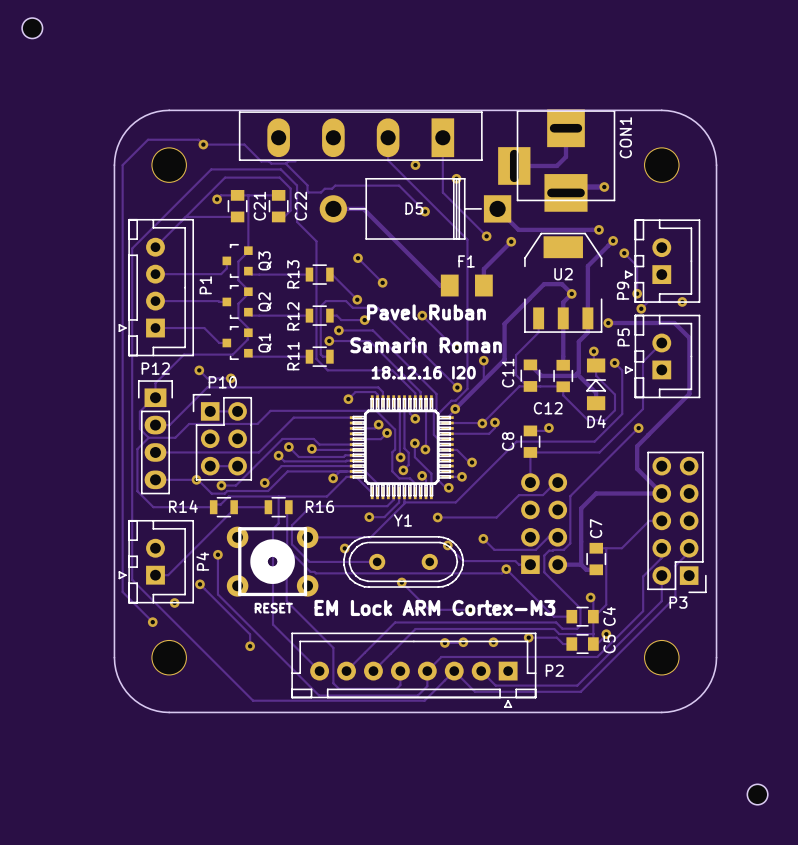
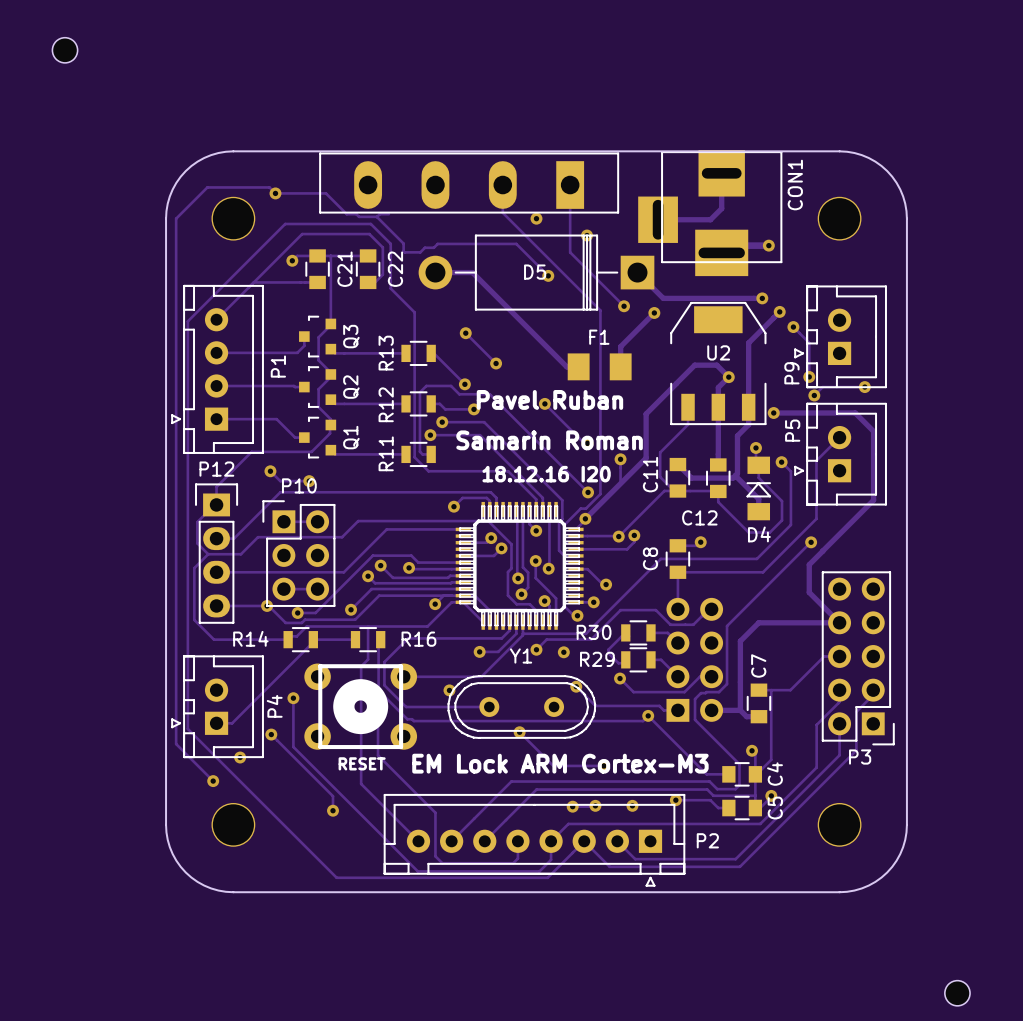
track: (524, 495) (519, 495) (496, 517) (437, 517) -> (670, 624) (655, 610) (620, 610) (591, 639) (546, 639) (536, 649)
R30: none -> (638, 632)
track: none -> (650, 632) (667, 632) (677, 643)
track: none -> (629, 636) (621, 636) (608, 649) (608, 653) (618, 663) (625, 663)
via: none -> (536, 649)
R29: none -> (638, 659)
track: none -> (650, 659) (661, 659) (677, 676)

